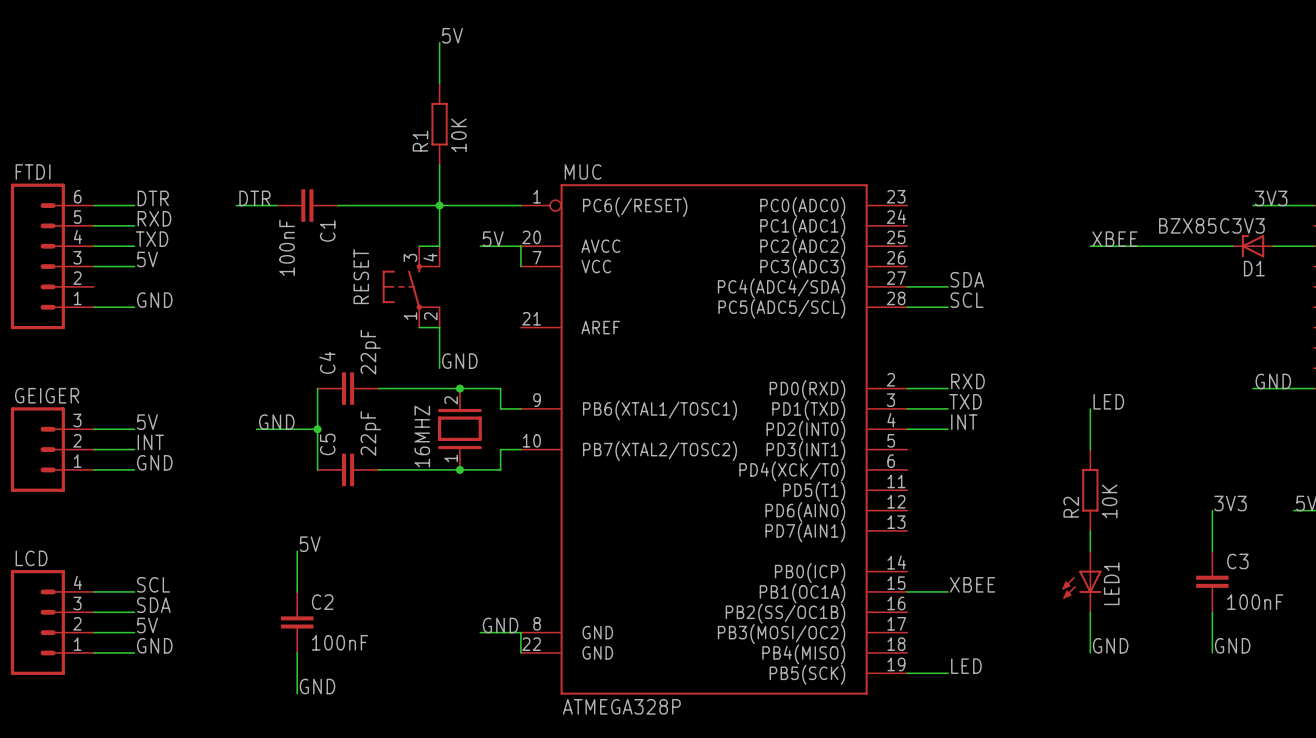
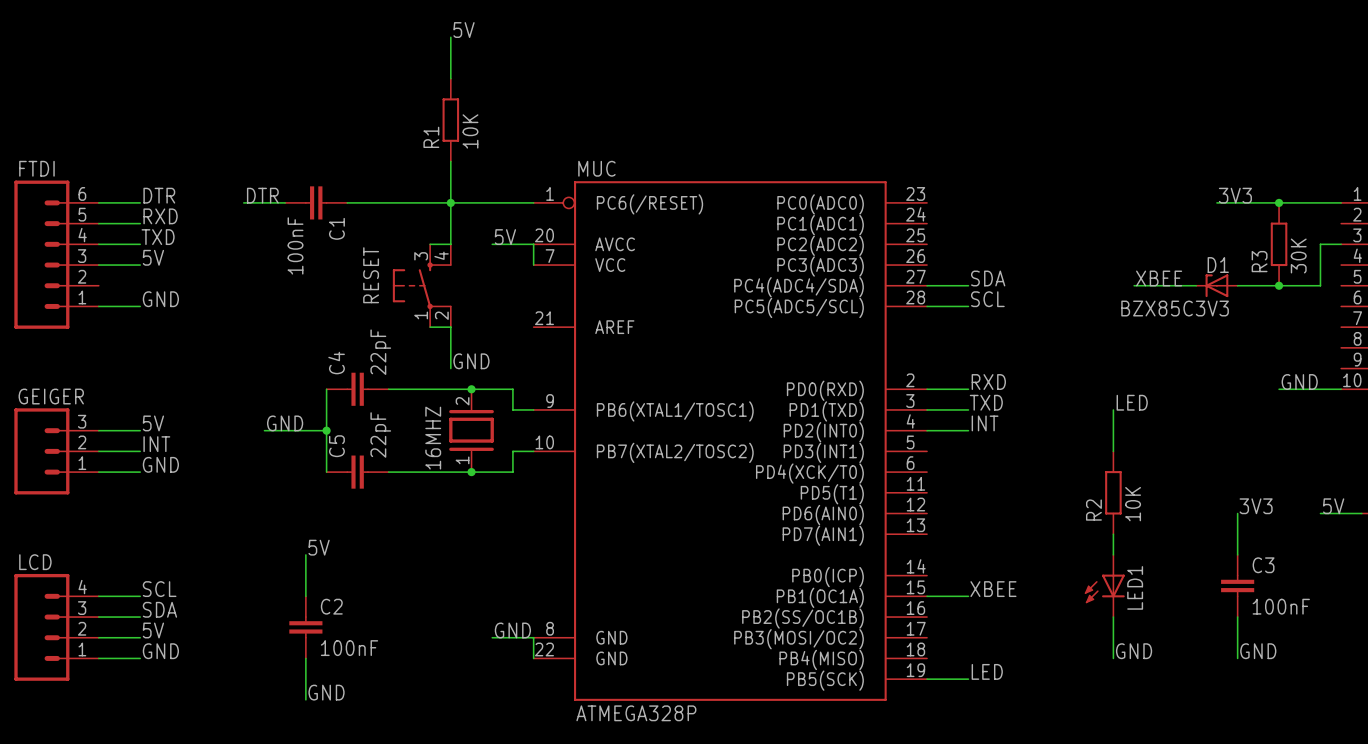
label position: 3V3 (1271, 198) -> 3V3 (1235, 195)
wire: none -> (1216, 202) (1279, 202)
junction: none -> (1279, 202)
label position: XBEE (1114, 239) -> XBEE (1159, 278)
wire: (1090, 246) (1232, 246) -> none
D1: BZX85C3V3 (1253, 246) -> none
R3: none -> 30K (1279, 244)
wire: (1273, 246) (1293, 246) -> (1237, 285) (1320, 285) (1320, 244)
wire: none -> (1134, 285) (1196, 285)
BZX85C3V3: none -> D1 (1216, 285)
junction: none -> (1279, 285)

